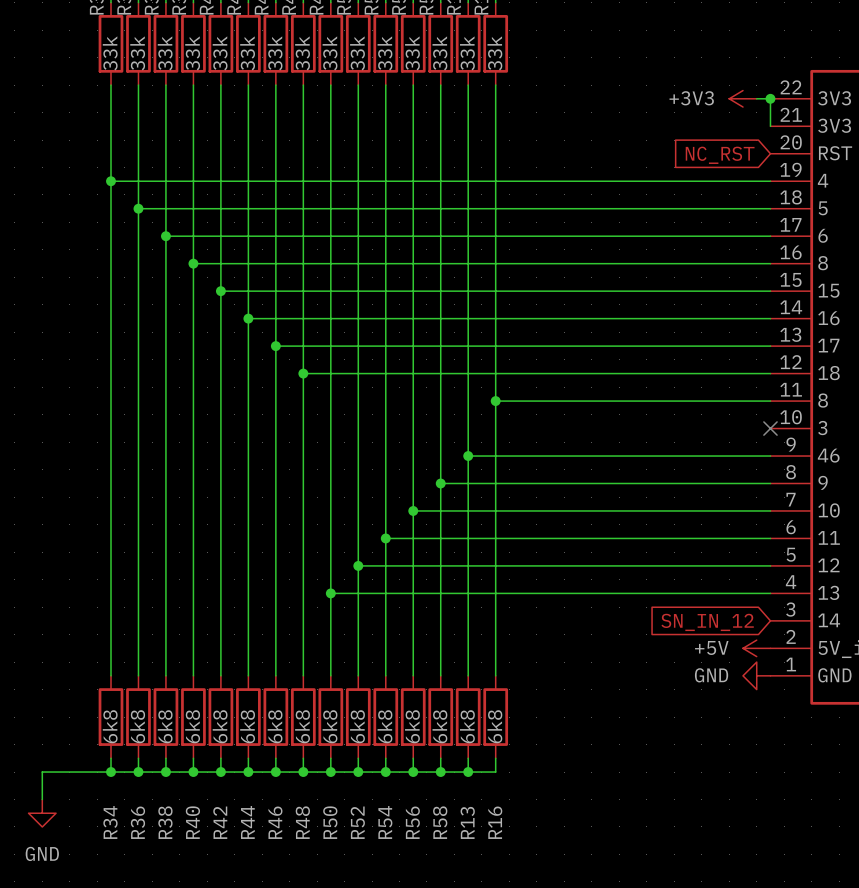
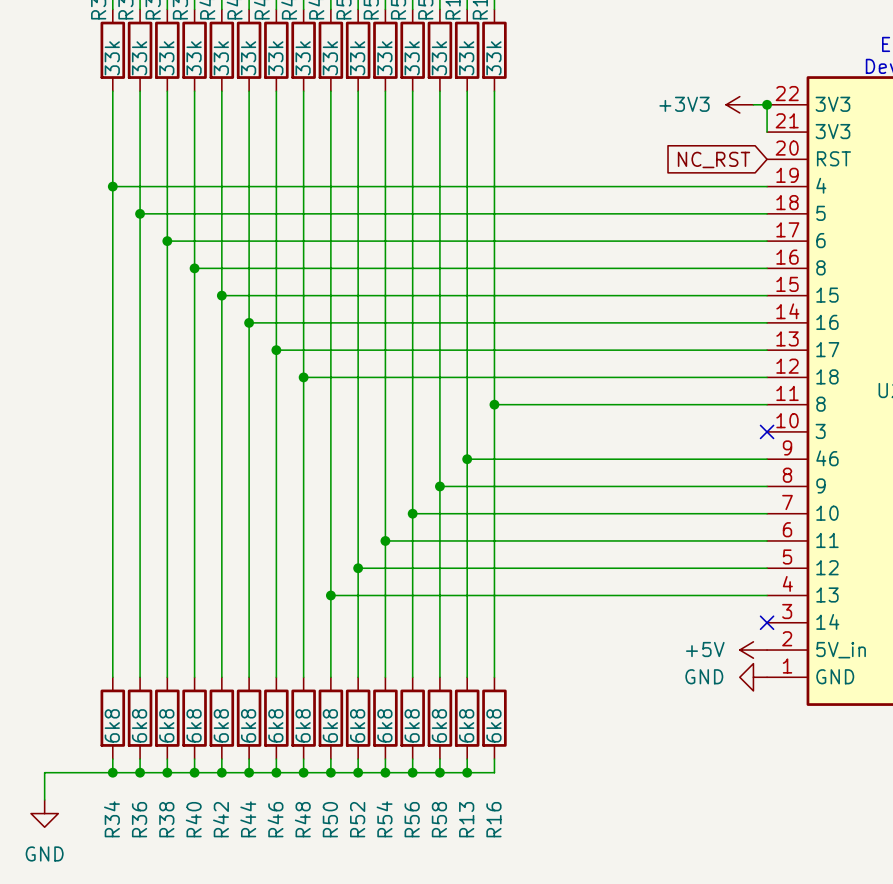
no-connect mark: none -> (767, 622)
global label: SN_IN_12 (707, 622) -> none

